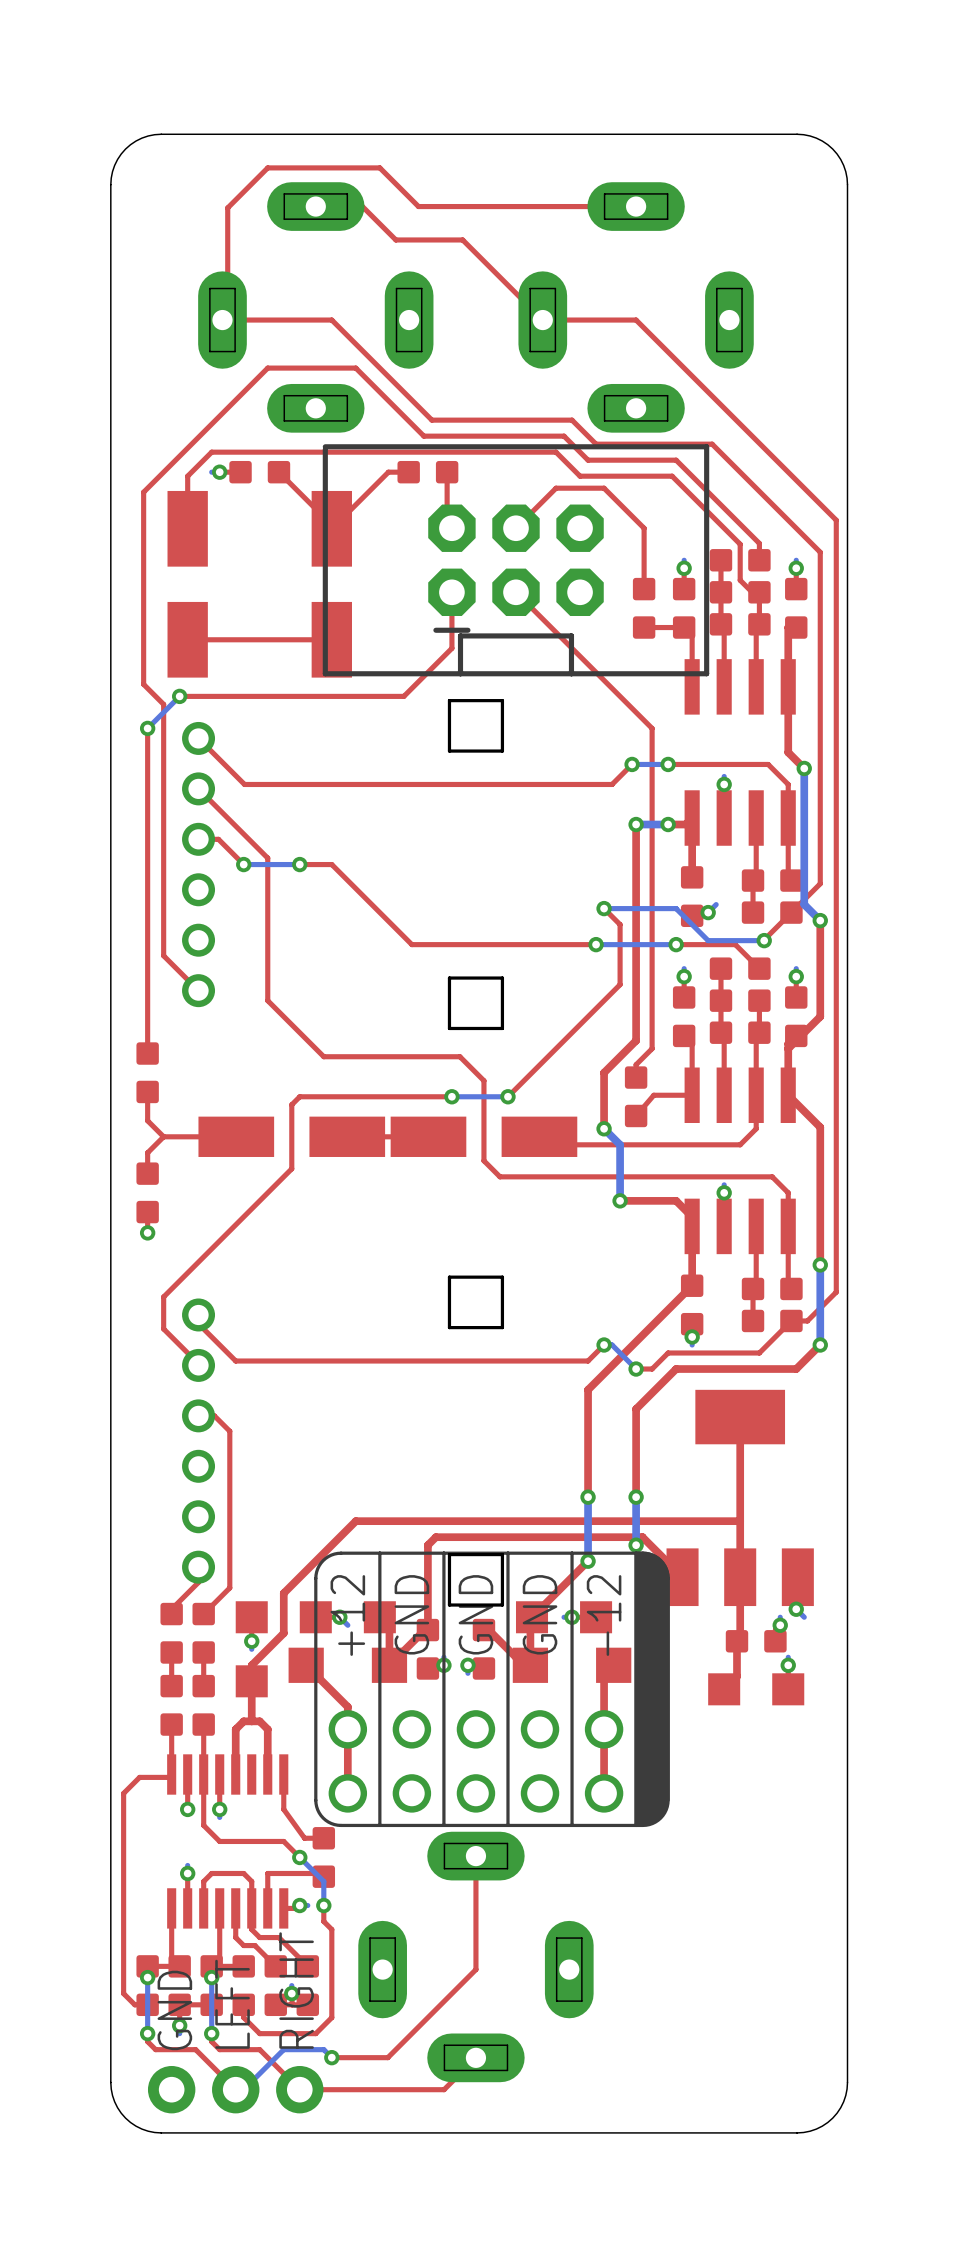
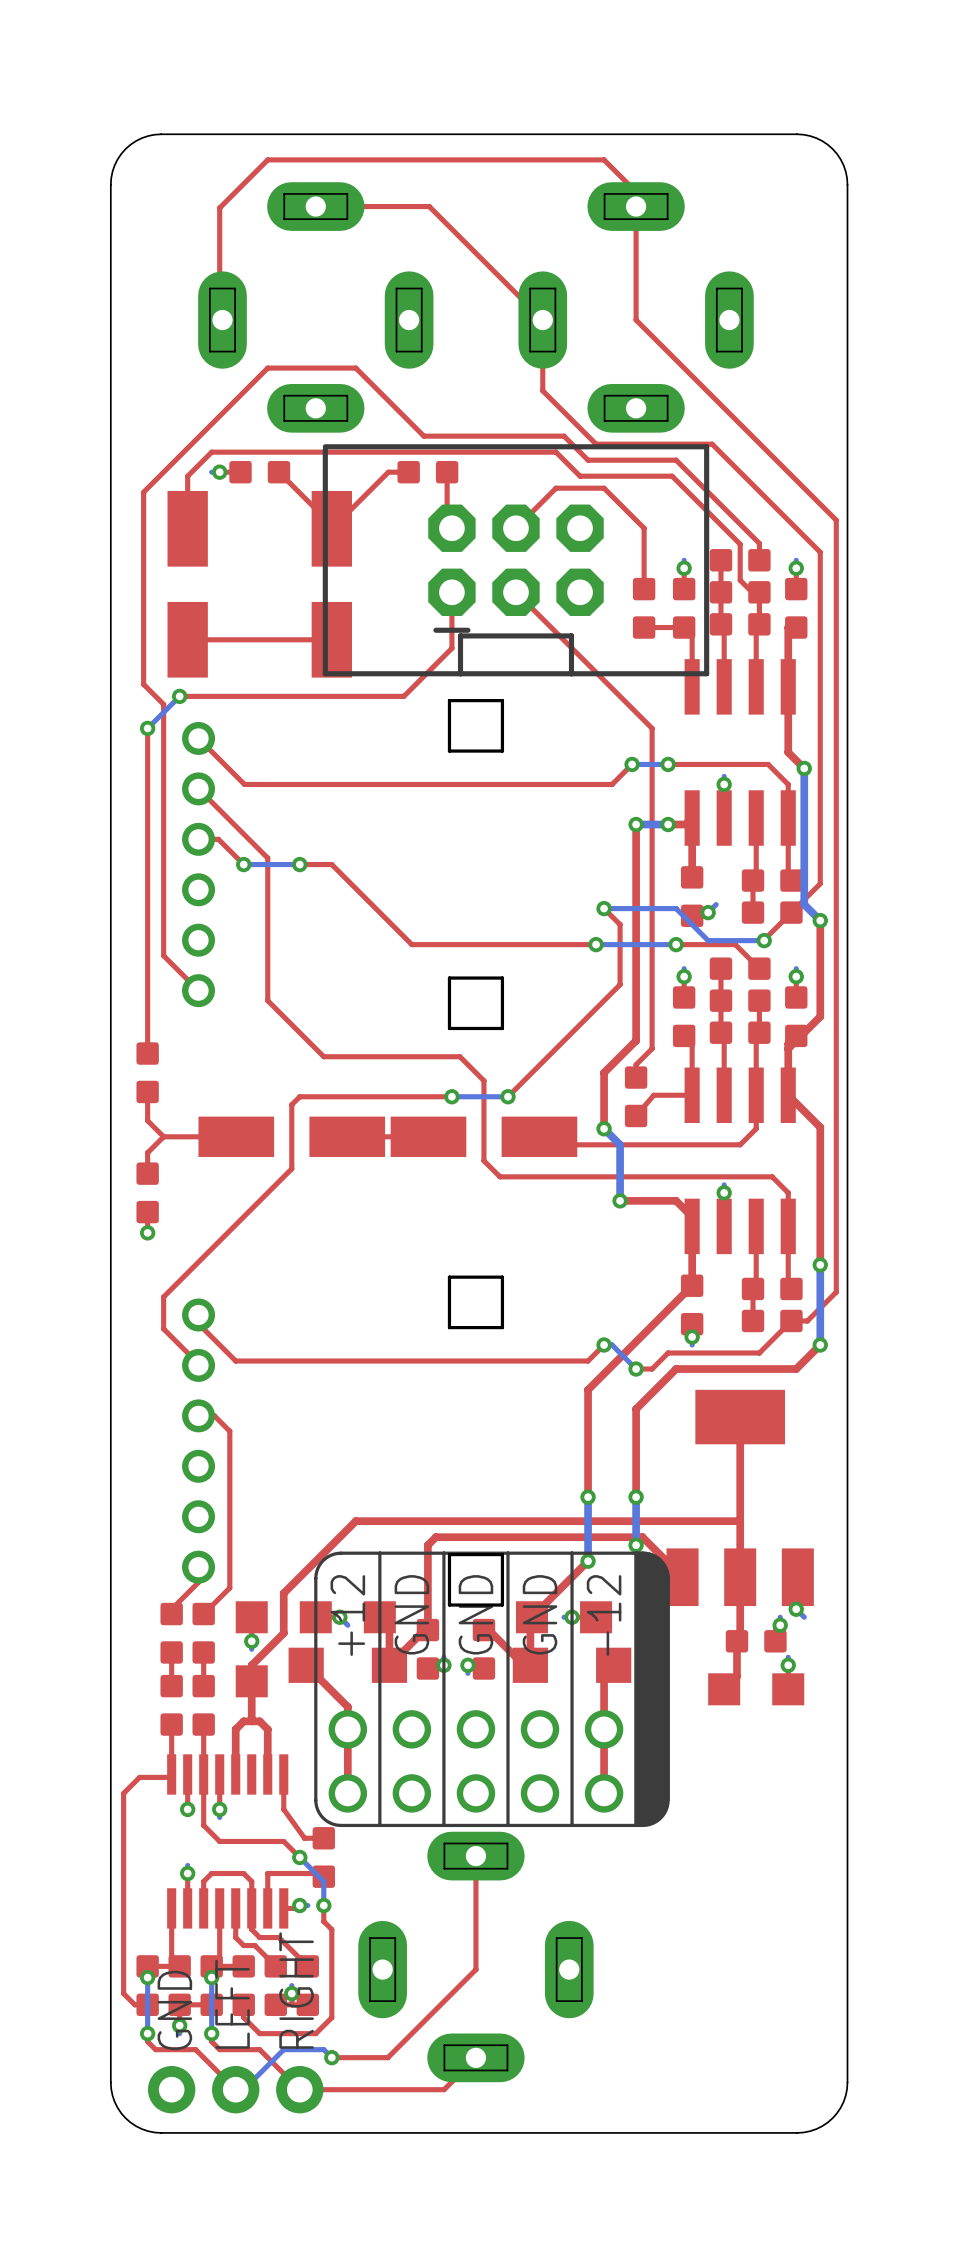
top track: (362, 206) (395, 239) (462, 239) -> (362, 206) (418, 206)
top track: (418, 206) (379, 167) (267, 167) (227, 207) (227, 314) (222, 320) (331, 320) (431, 420) (572, 420) -> none
top track: (636, 206) (429, 206) -> (462, 239) (429, 206)
top track: (636, 320) (542, 320) -> (572, 420) (542, 390) (542, 320)
top track: none -> (636, 320) (636, 191) (604, 159) (267, 159) (219, 207) (219, 317) (222, 320)

